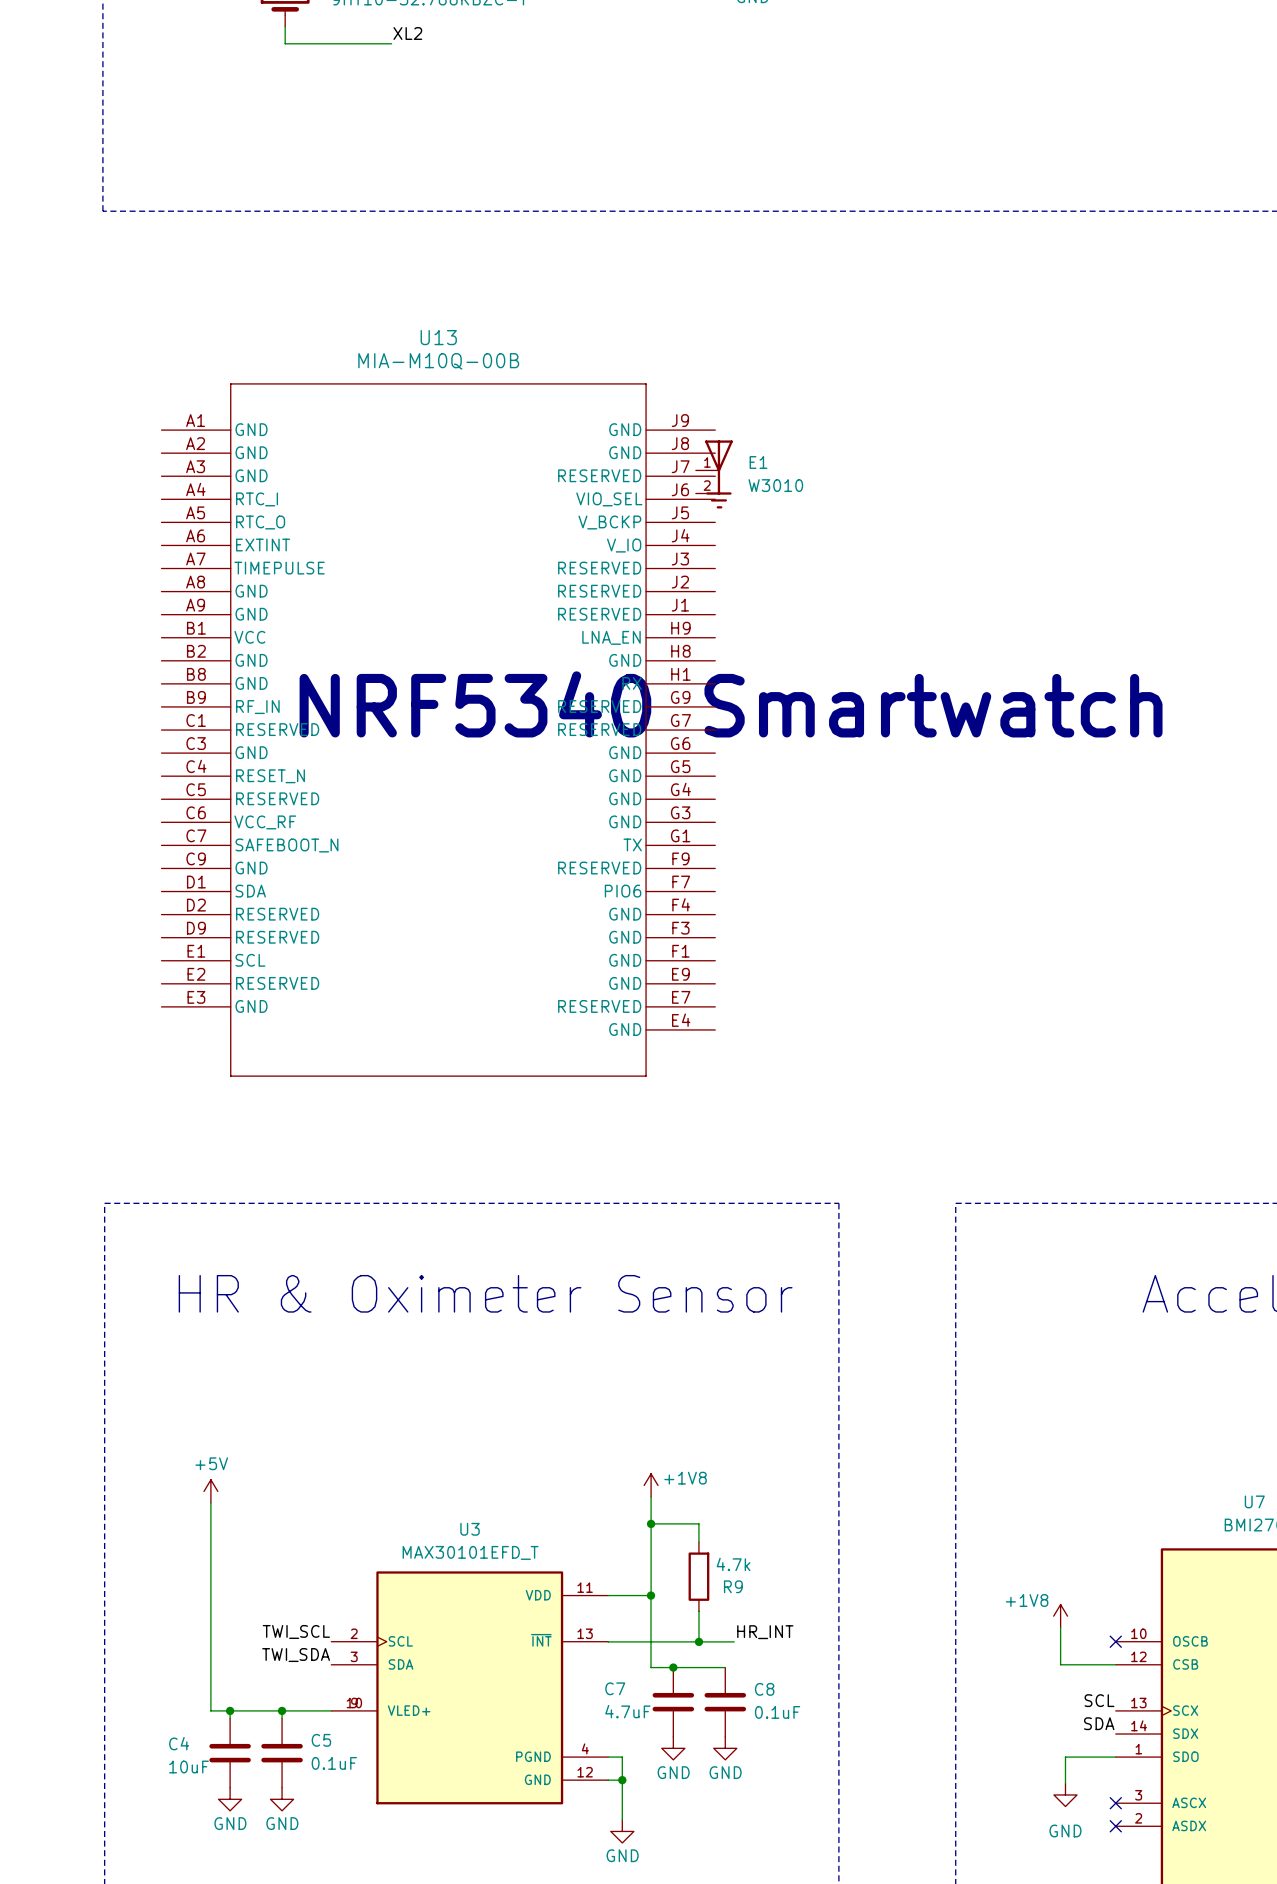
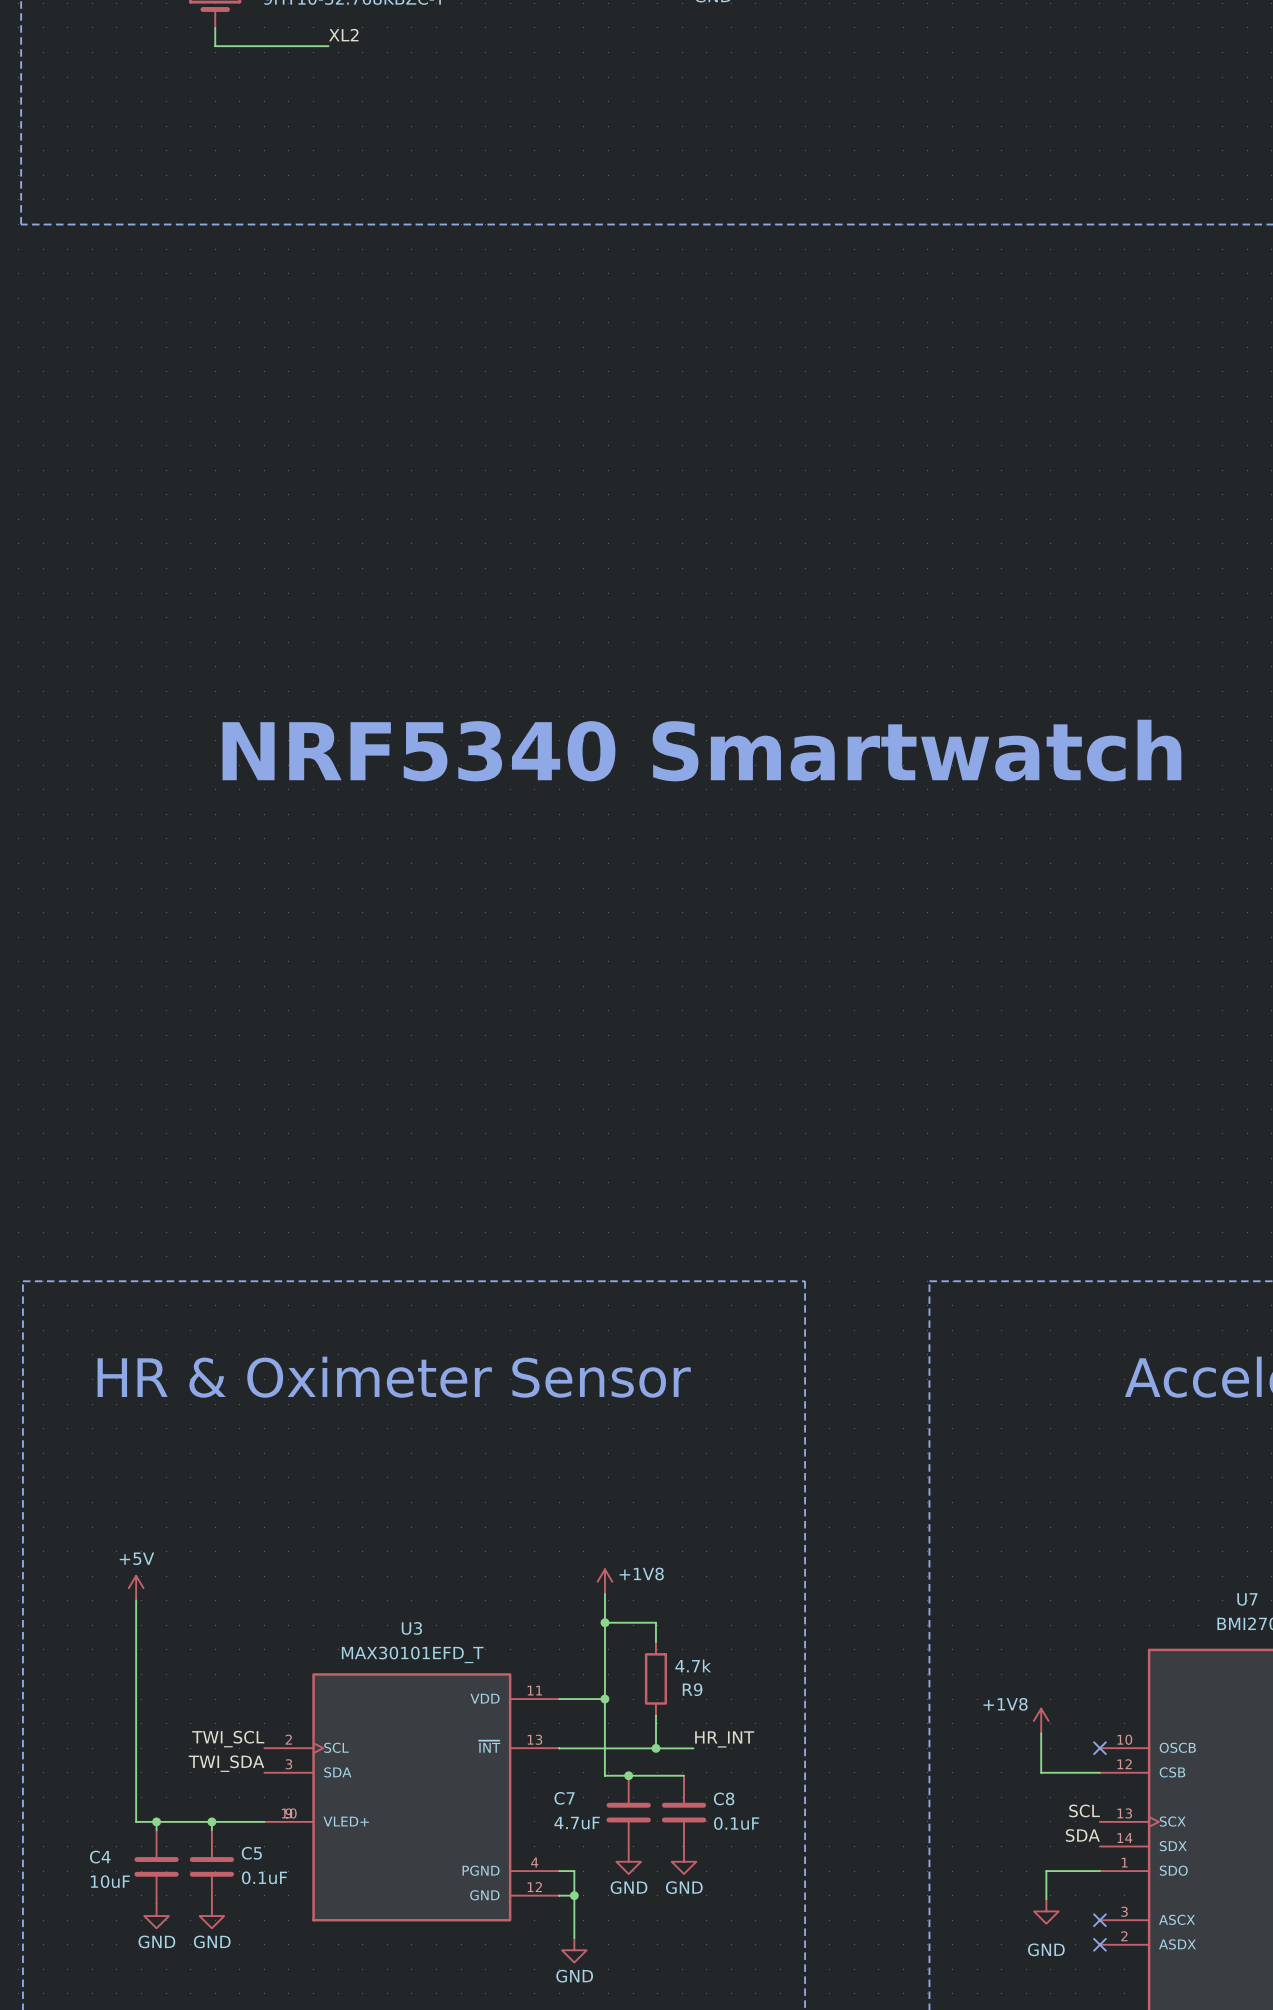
E1: W3010 (714, 474) -> none
U13: MIA-M10Q-00B (438, 730) -> none

